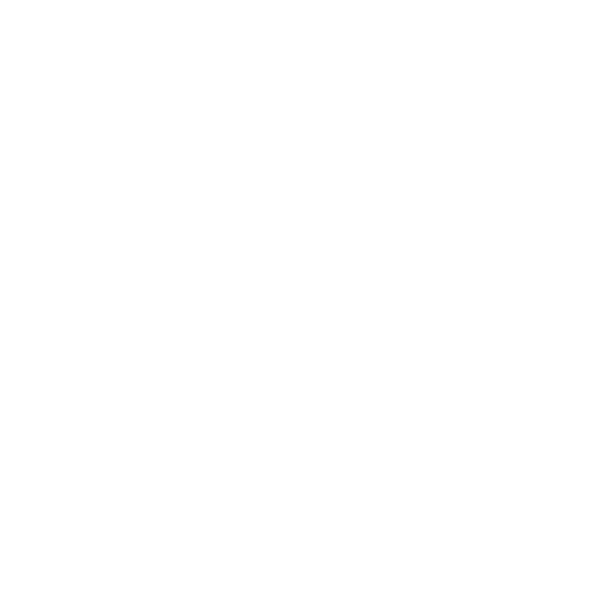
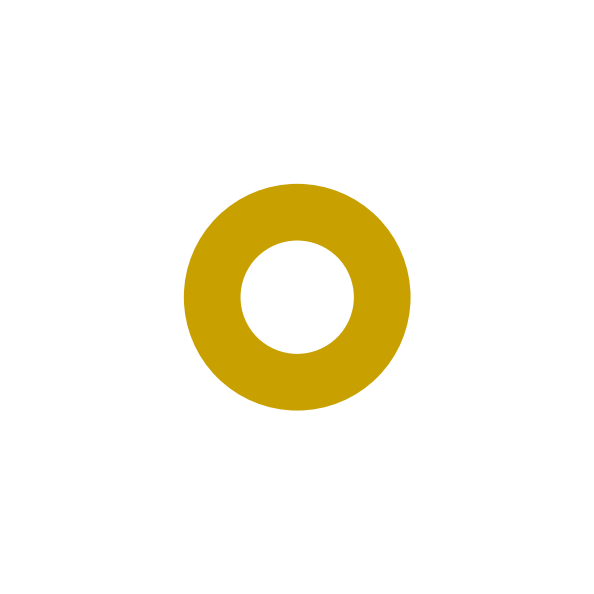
part: none -> (297, 297)

